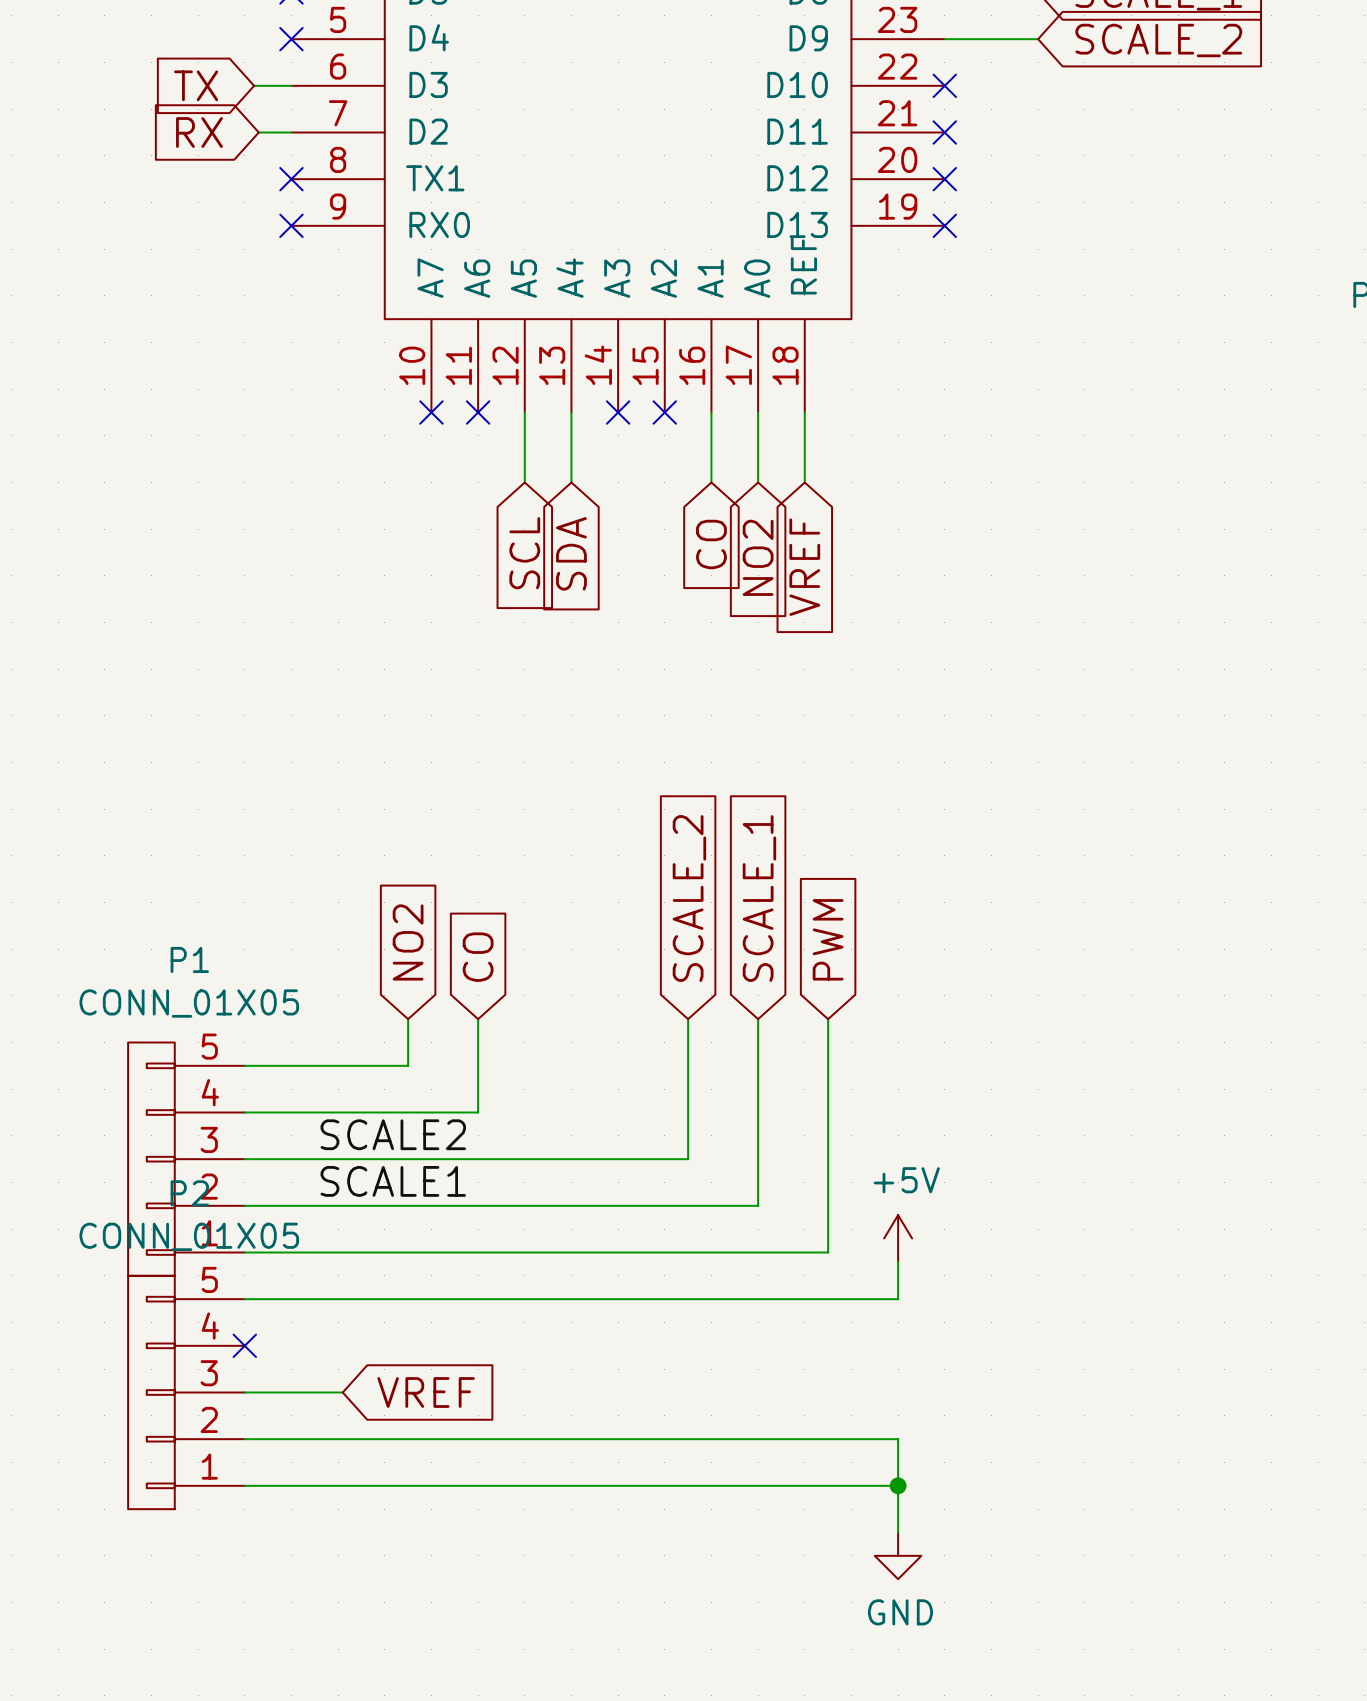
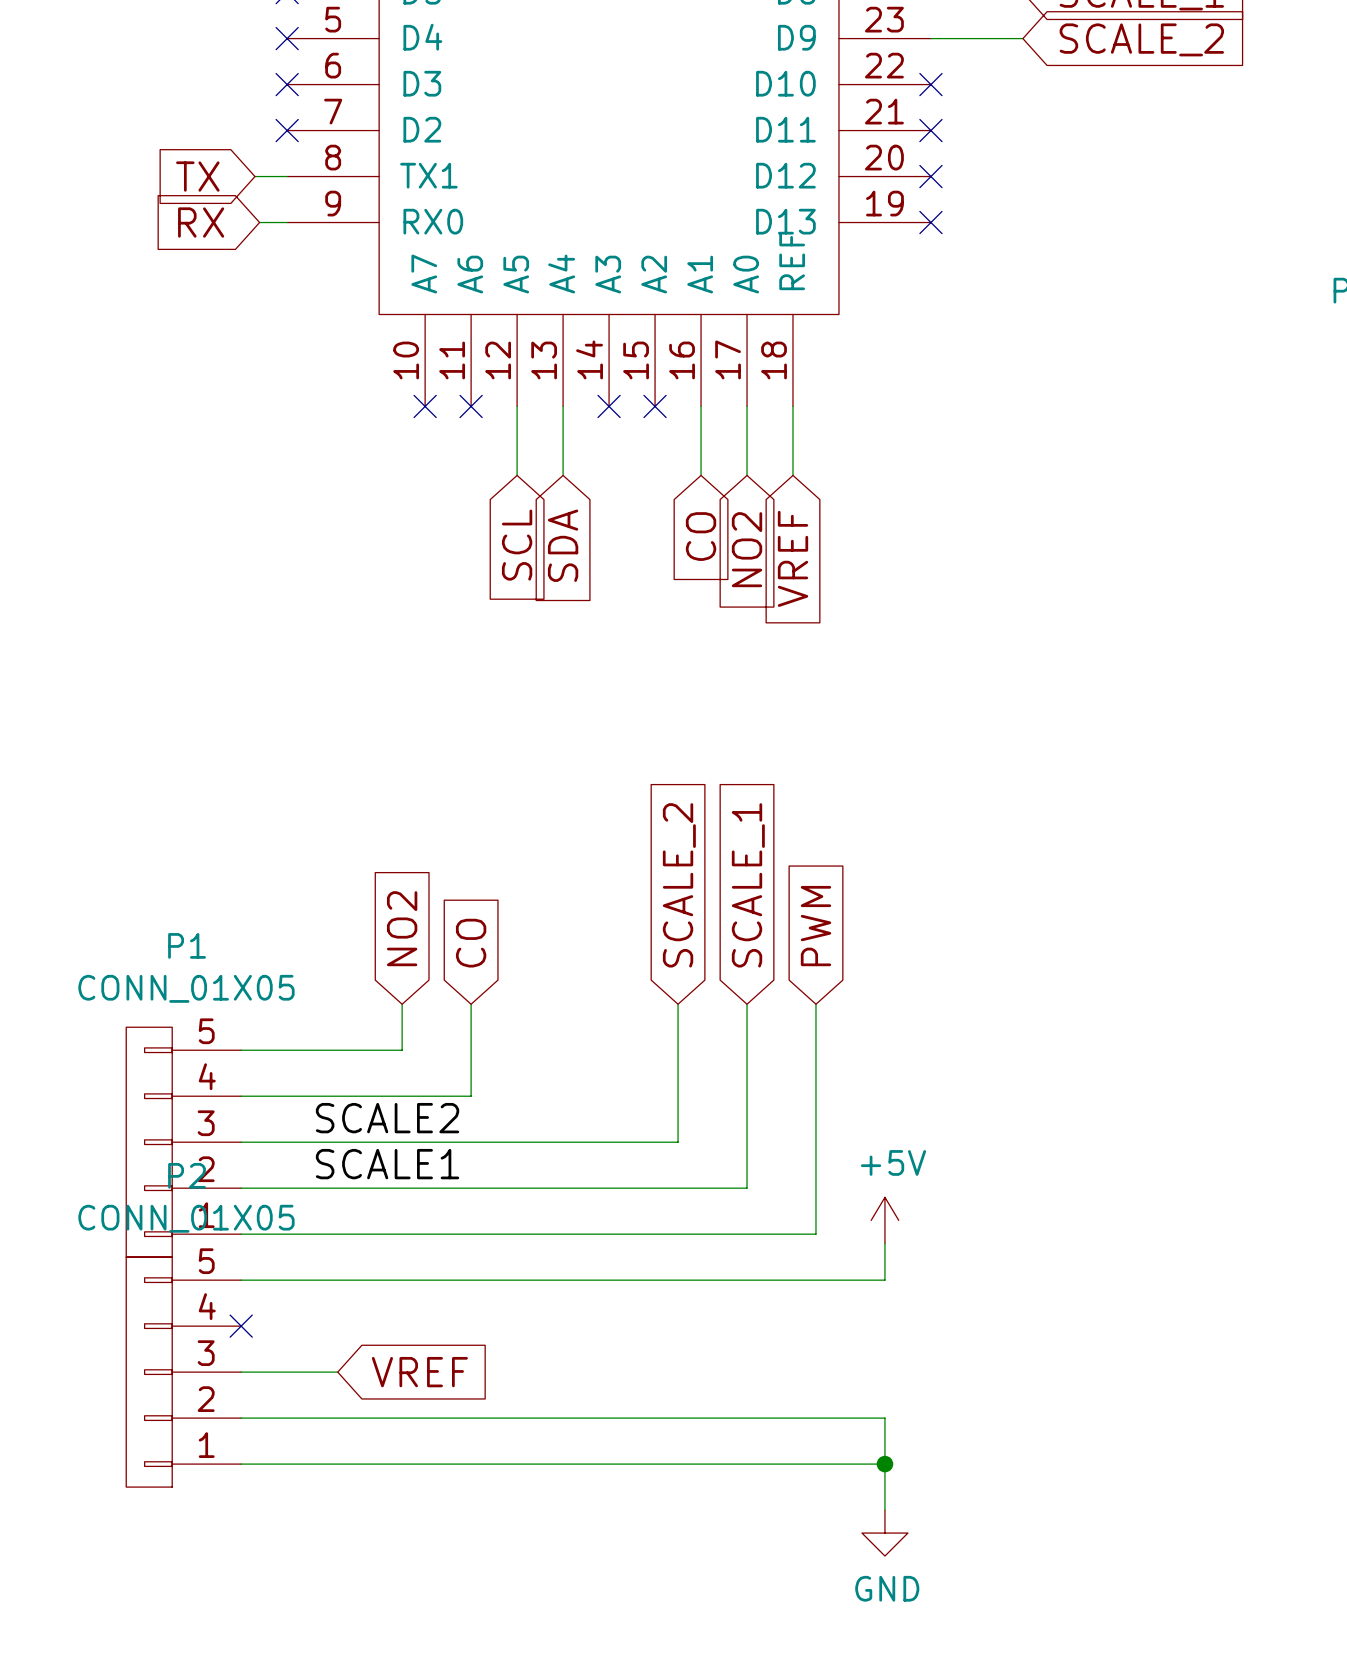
global label position: TX (196, 85) -> TX (197, 176)
wire: (254, 85) (291, 85) -> none
no-connect mark: none -> (287, 84)
global label position: RX (199, 132) -> RX (201, 222)
wire: (258, 132) (291, 132) -> (254, 176) (287, 176)
no-connect mark: none -> (287, 130)
no-connect mark: (291, 179) -> none
wire: none -> (259, 222) (287, 222)
no-connect mark: (291, 225) -> none

